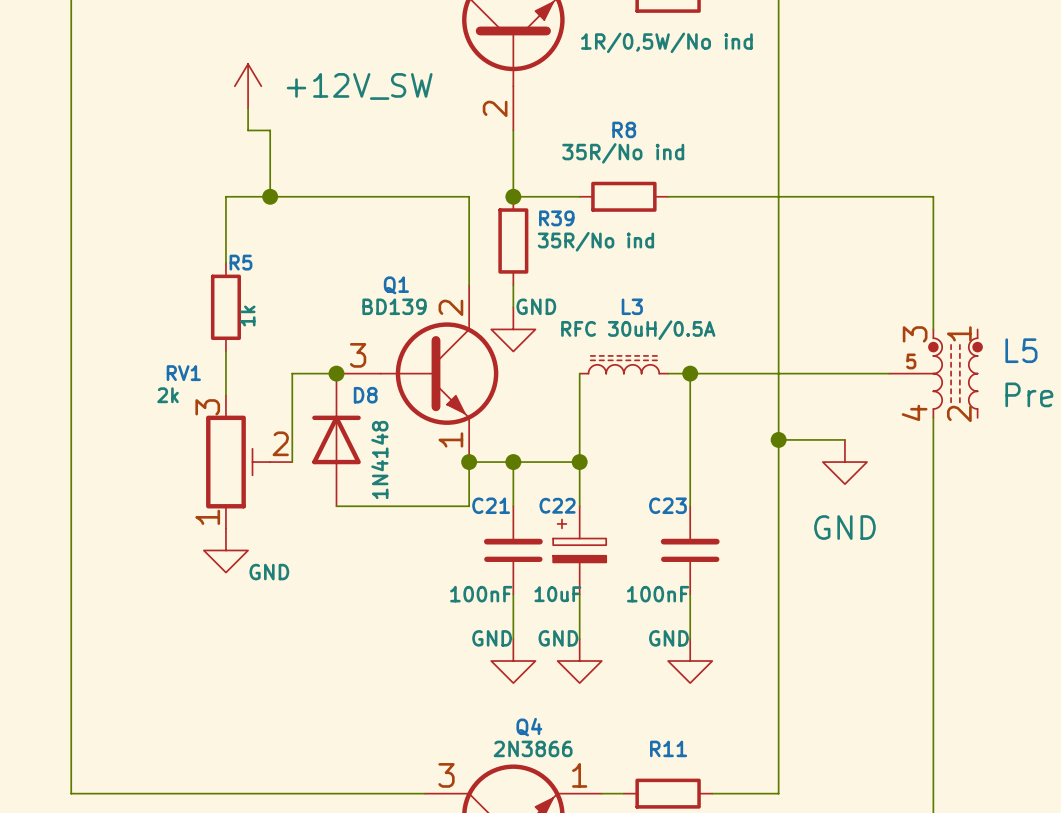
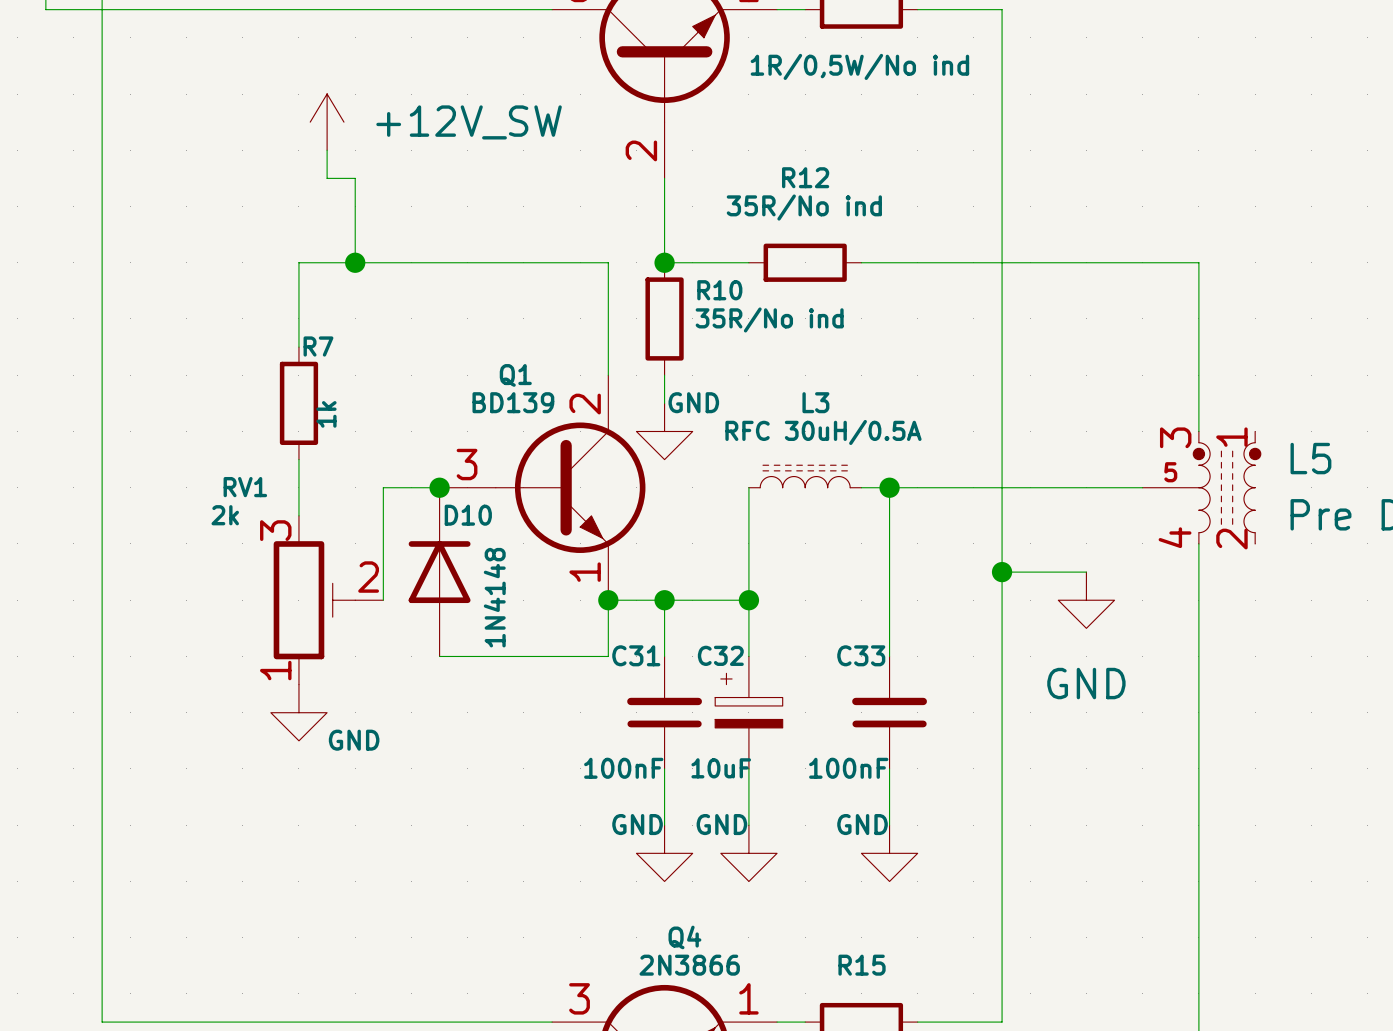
R8 name: R8 (624, 129) -> R12 (805, 177)
R39 name: R39 (556, 218) -> R10 (719, 290)
R5 name: R5 (240, 262) -> R7 (318, 346)
D8 name: D8 (365, 395) -> D10 (468, 515)
C21 name: C21 (491, 505) -> C31 (636, 655)
C22 name: C22 (557, 505) -> C32 (720, 655)
C23 name: C23 (667, 505) -> C33 (861, 655)
R11 name: R11 (668, 748) -> R15 (862, 965)

